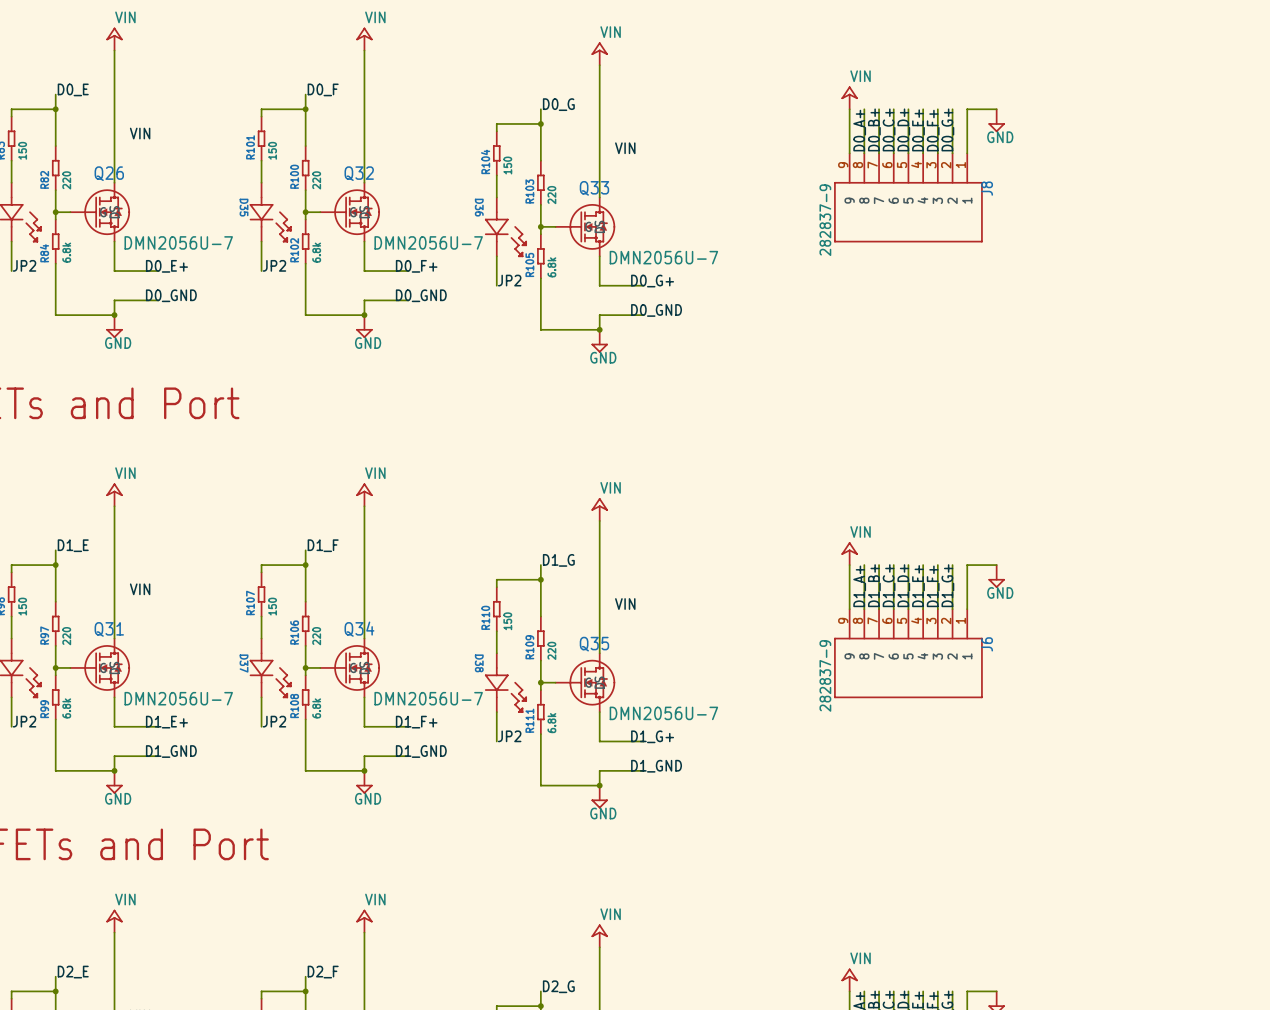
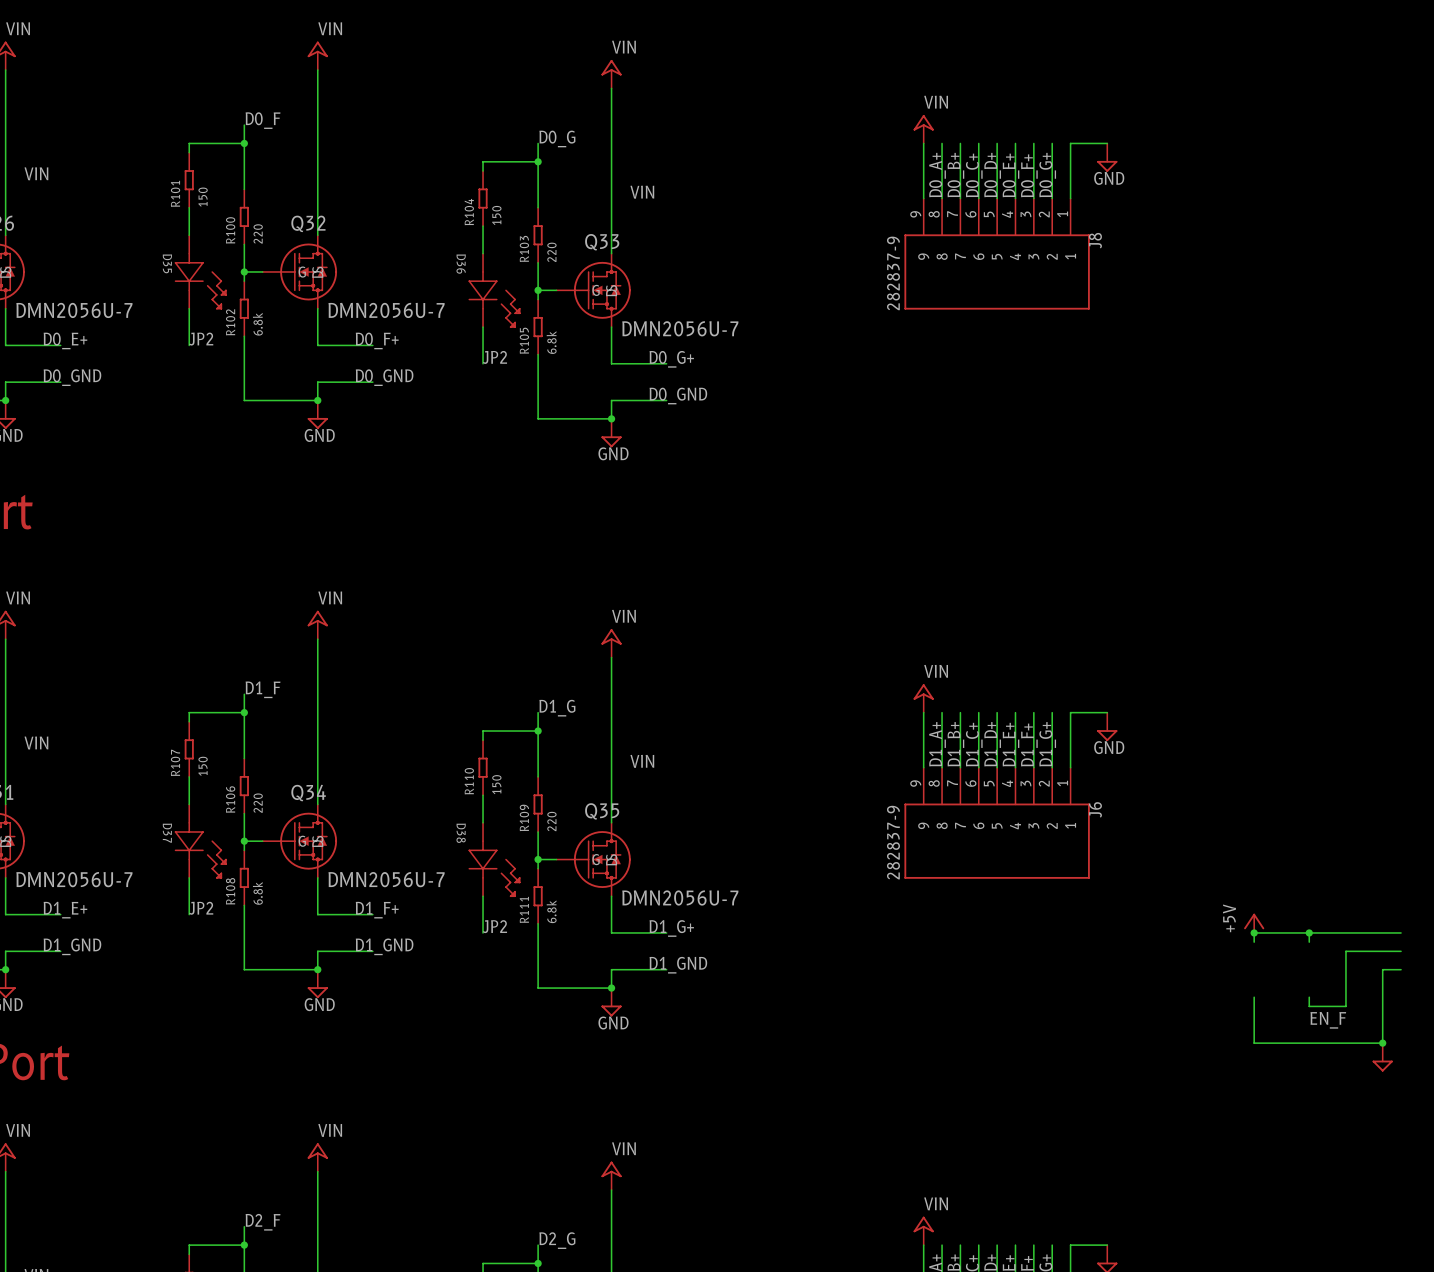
power symbol: none -> +5V (1254, 923)
junction: none -> (1254, 932)
wire: none -> (1309, 932) (1309, 942)
junction: none -> (1309, 932)
wire: none -> (1401, 932) (1254, 932) (1254, 942)
wire: none -> (1401, 951) (1345, 951) (1345, 1006) (1309, 1006) (1309, 997)
wire: none -> (1401, 969) (1382, 969) (1382, 1043) (1254, 1043) (1254, 997)
label: none -> EN_F (1328, 1020)
junction: none -> (1382, 1043)
power symbol: none -> (1382, 1057)

